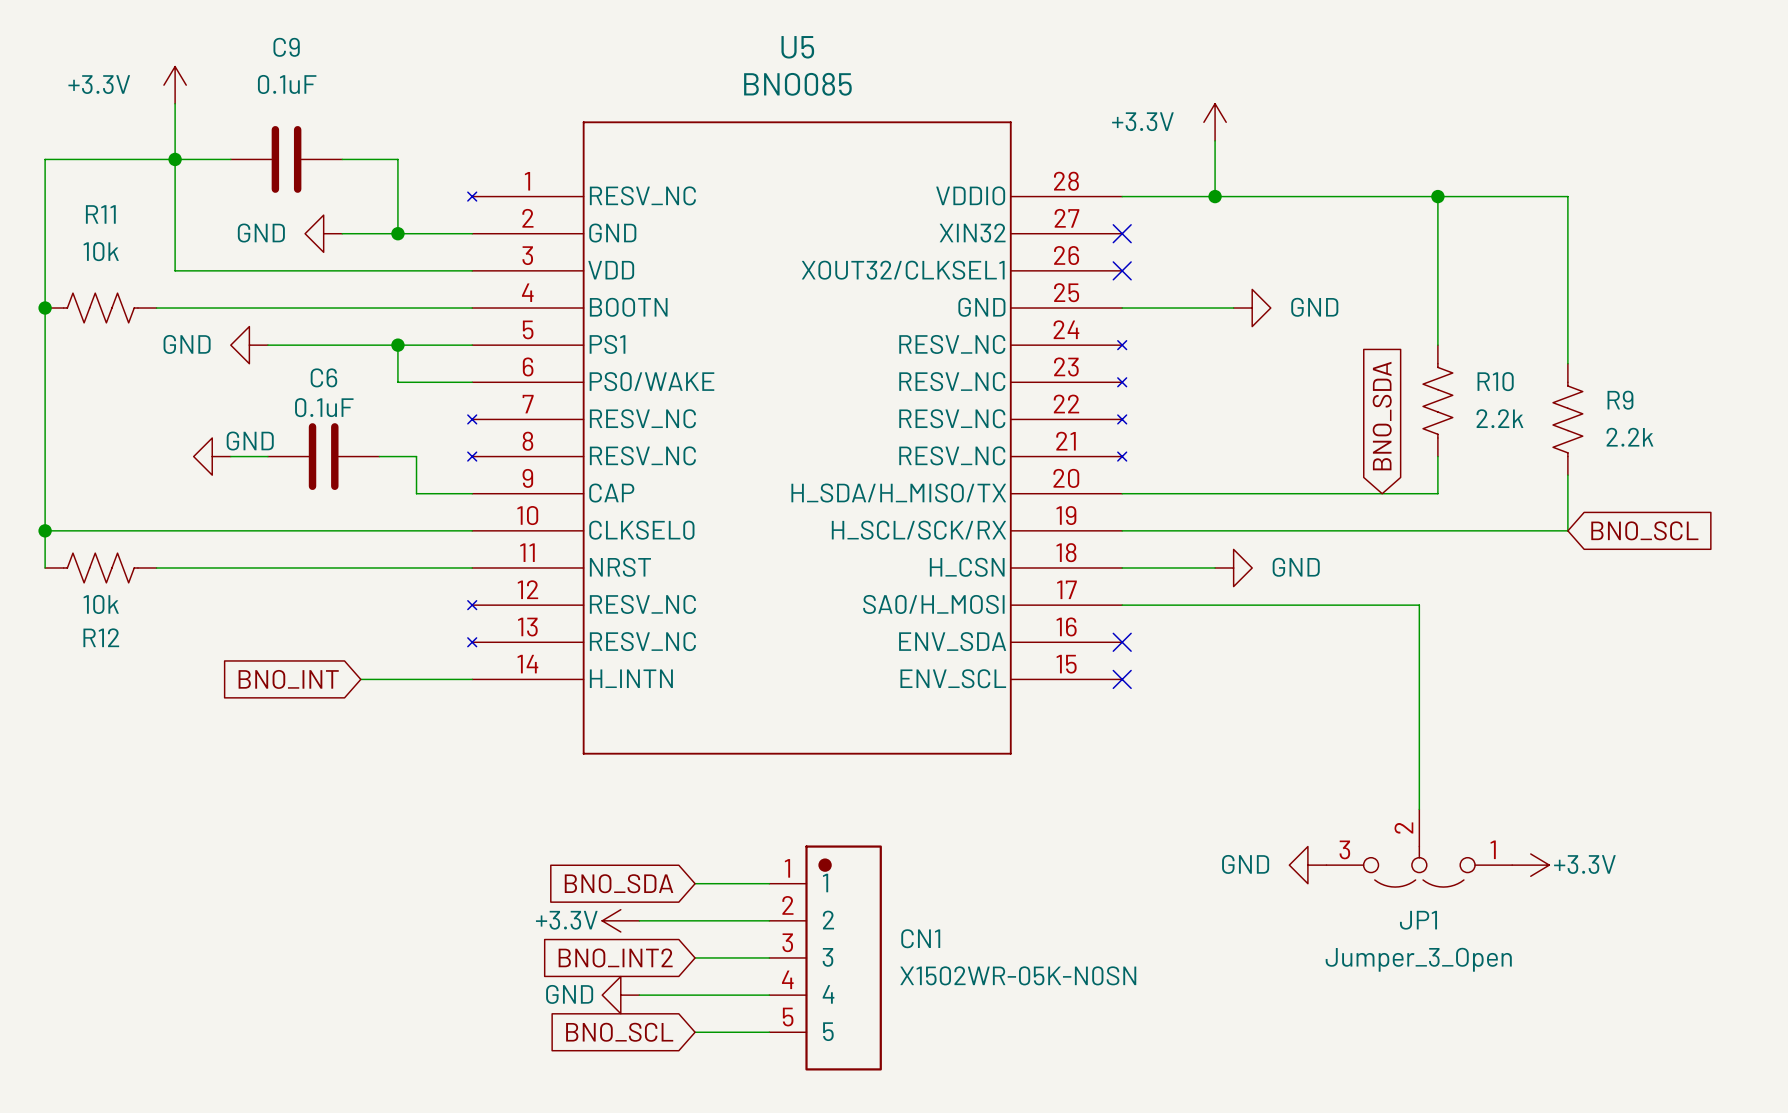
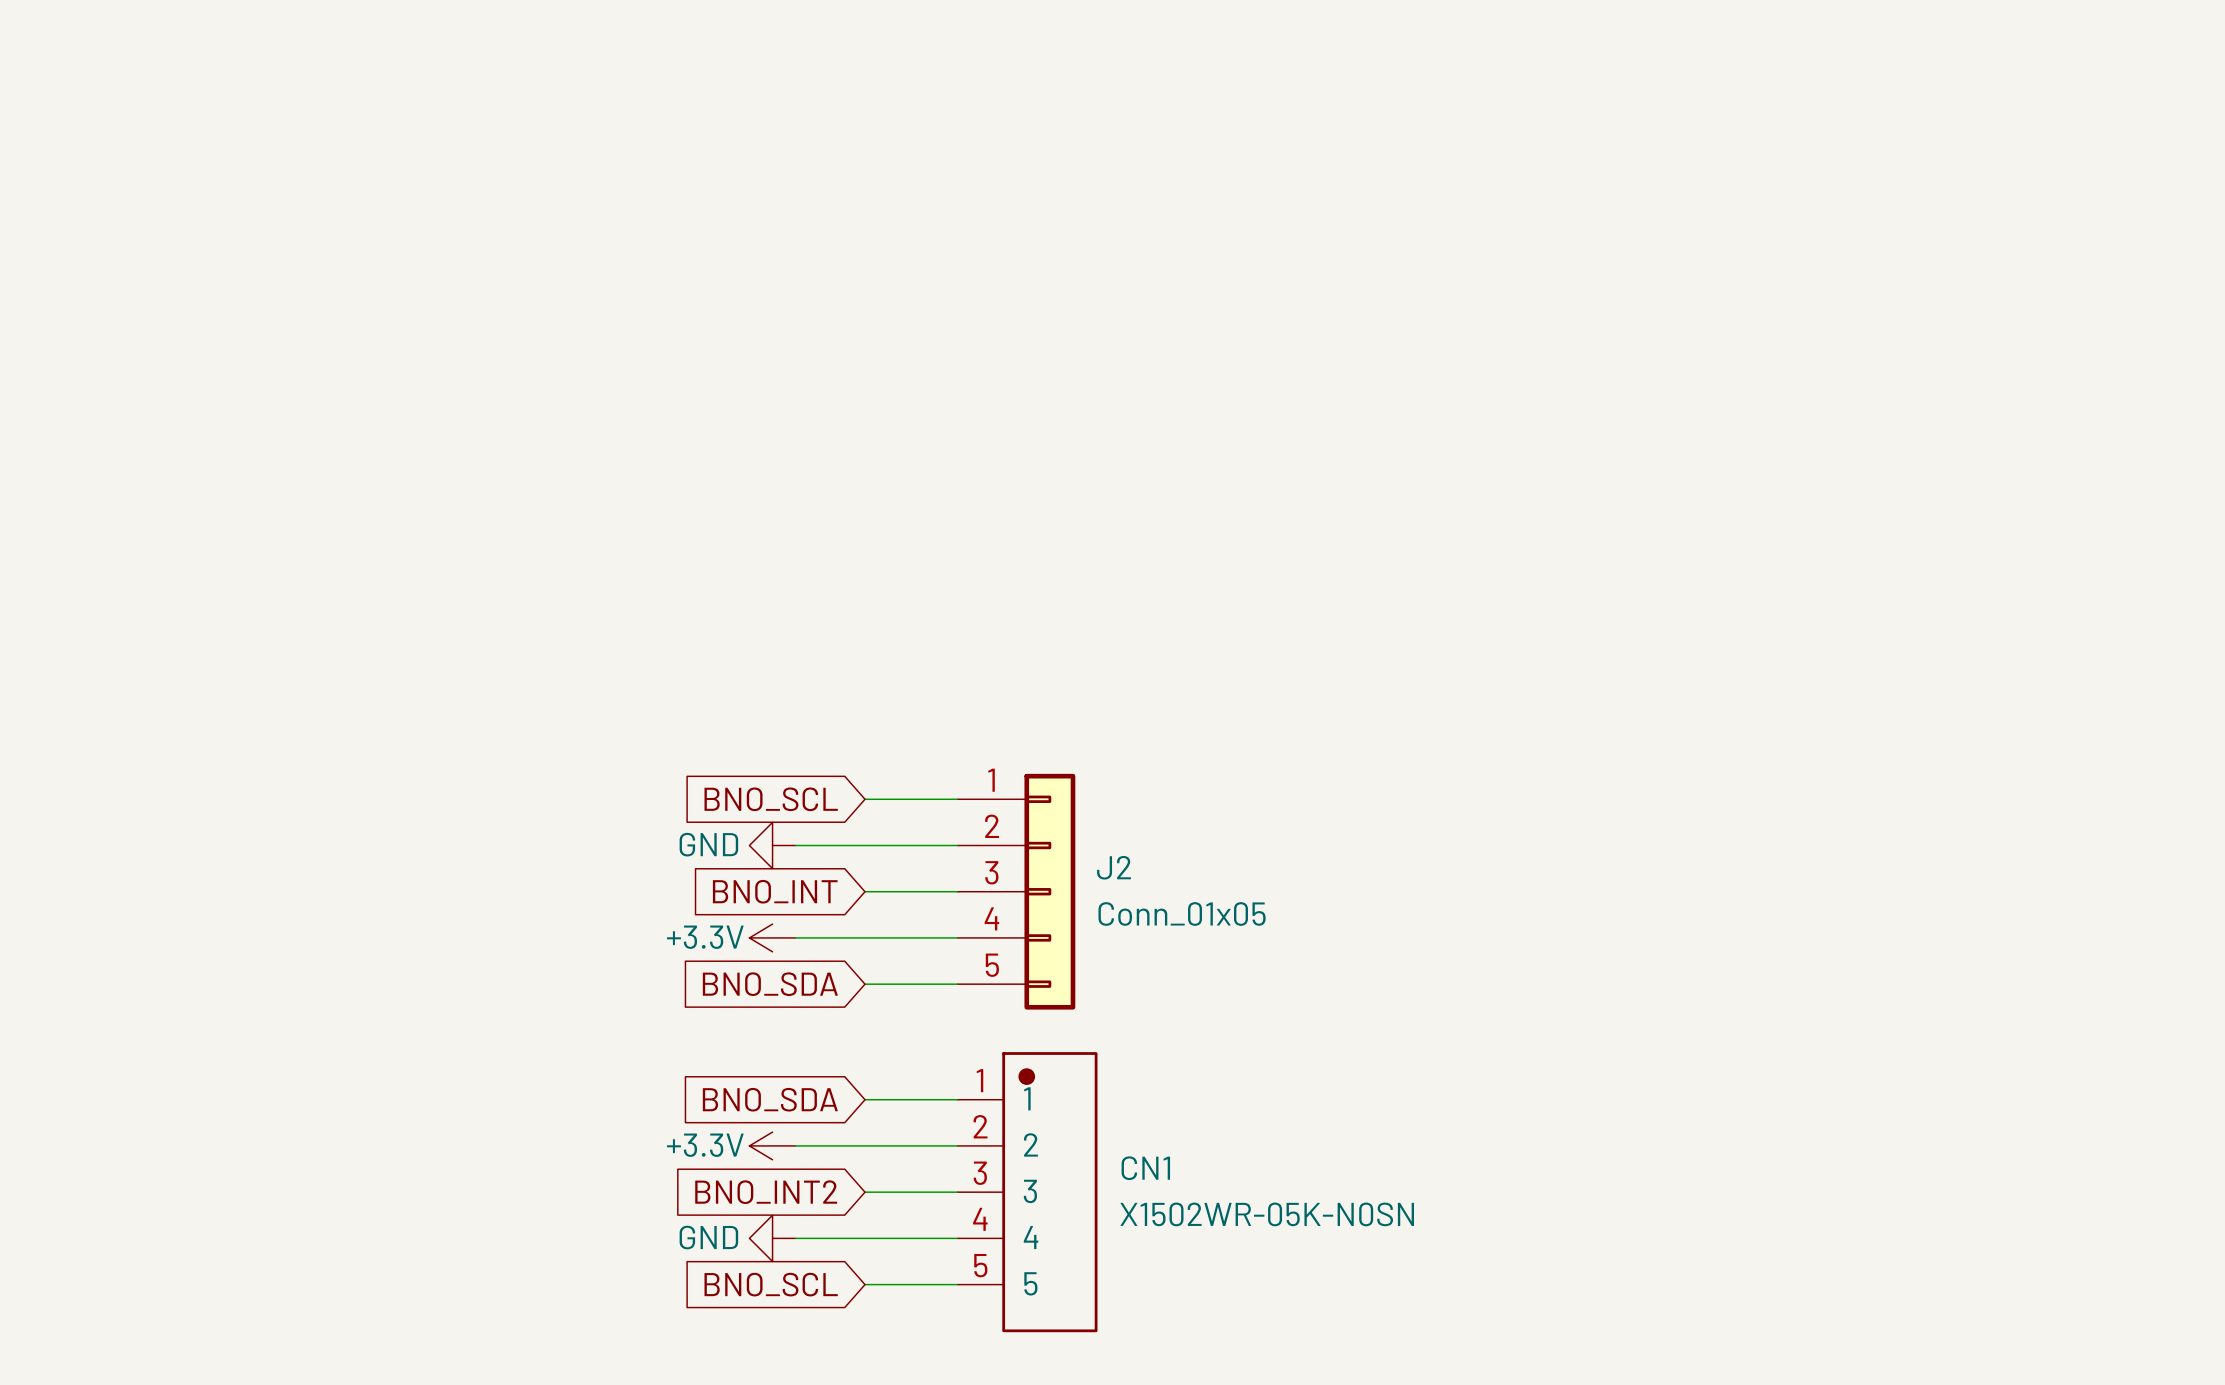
power symbol: +3.3V (175, 85) -> none
wire: (175, 103) (175, 270) (472, 270) -> none
power symbol: +3.3V (1215, 122) -> none
wire: (1215, 140) (1215, 196) -> none
junction: (175, 159) -> none
wire: (230, 159) (45, 159) (45, 567) -> none
C9: 0.1uF (286, 159) -> none
wire: (342, 159) (397, 159) (397, 233) -> none
wire: (1122, 196) (1567, 196) (1567, 363) -> none
junction: (1215, 196) -> none
wire: (1437, 196) (1437, 345) -> none
junction: (1437, 196) -> none
power symbol: GND (323, 233) -> none
wire: (342, 233) (472, 233) -> none
junction: (397, 233) -> none
no-connect mark: (1122, 233) -> none
no-connect mark: (1122, 270) -> none
junction: (45, 308) -> none
R11: 10k (100, 308) -> none
wire: (156, 308) (472, 308) -> none
wire: (1122, 308) (1233, 308) -> none
power symbol: GND (1252, 308) -> none
power symbol: GND (249, 345) -> none
wire: (267, 345) (472, 345) -> none
wire: (397, 345) (397, 382) (472, 382) -> none
junction: (397, 345) -> none
R10: 2.2k (1437, 400) -> none
global label: BNO_SDA (1382, 416) -> none
R9: 2.2k (1567, 419) -> none
U5: BNO085 (797, 438) -> none
power symbol: GND (212, 456) -> none
wire: (230, 456) (267, 456) -> none
C6: 0.1uF (323, 456) -> none
wire: (379, 456) (416, 456) (416, 493) (472, 493) -> none
wire: (1437, 456) (1437, 493) (1122, 493) -> none
wire: (1567, 475) (1567, 530) (1122, 530) -> none
wire: (45, 530) (472, 530) -> none
junction: (45, 530) -> none
global label: BNO_SCL (1644, 530) -> none
R12: 10k (100, 567) -> none
wire: (156, 567) (472, 567) -> none
wire: (1122, 567) (1215, 567) -> none
power symbol: GND (1233, 567) -> none
wire: (1122, 605) (1419, 605) (1419, 809) -> none
global label: none -> BNO_SCL (771, 799)
wire: none -> (864, 799) (957, 799)
no-connect mark: (1122, 642) -> none
global label position: BNO_INT (288, 679) -> BNO_INT (775, 891)
wire: (360, 679) (472, 679) -> none
power symbol: none -> GND (772, 845)
wire: none -> (795, 845) (957, 845)
no-connect mark: (1122, 679) -> none
wire: none -> (864, 891) (957, 891)
J2: none -> Conn_01x05 (1016, 891)
power symbol: none -> +3.3V (772, 937)
global label: none -> BNO_SDA (770, 984)
wire: none -> (864, 984) (957, 984)
JP1: Jumper_3_Open (1419, 848) -> none
power symbol: GND (1307, 865) -> none
power symbol: +3.3V (1530, 865) -> none

